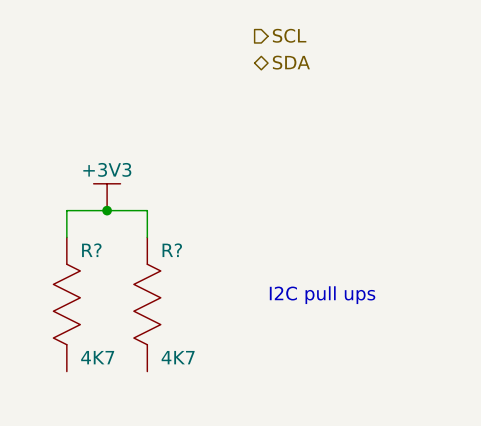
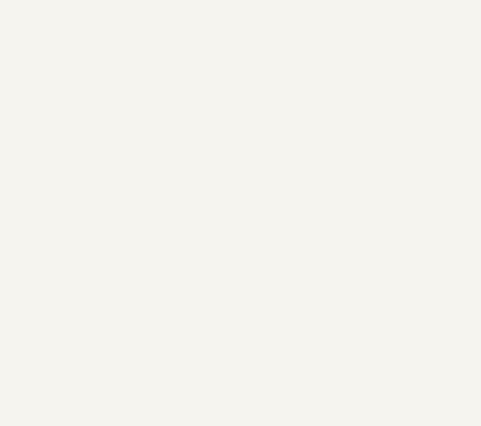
hierarchical label: SCL (289, 35) -> none
hierarchical label: SDA (291, 62) -> none
power symbol: +3V3 (107, 197) -> none
junction: (107, 210) -> none
wire: (66, 237) (66, 210) (147, 210) (147, 237) -> none
text: I2C pull ups (322, 295) -> none
R?: 4K7 (66, 304) -> none
R?: 4K7 (147, 304) -> none

